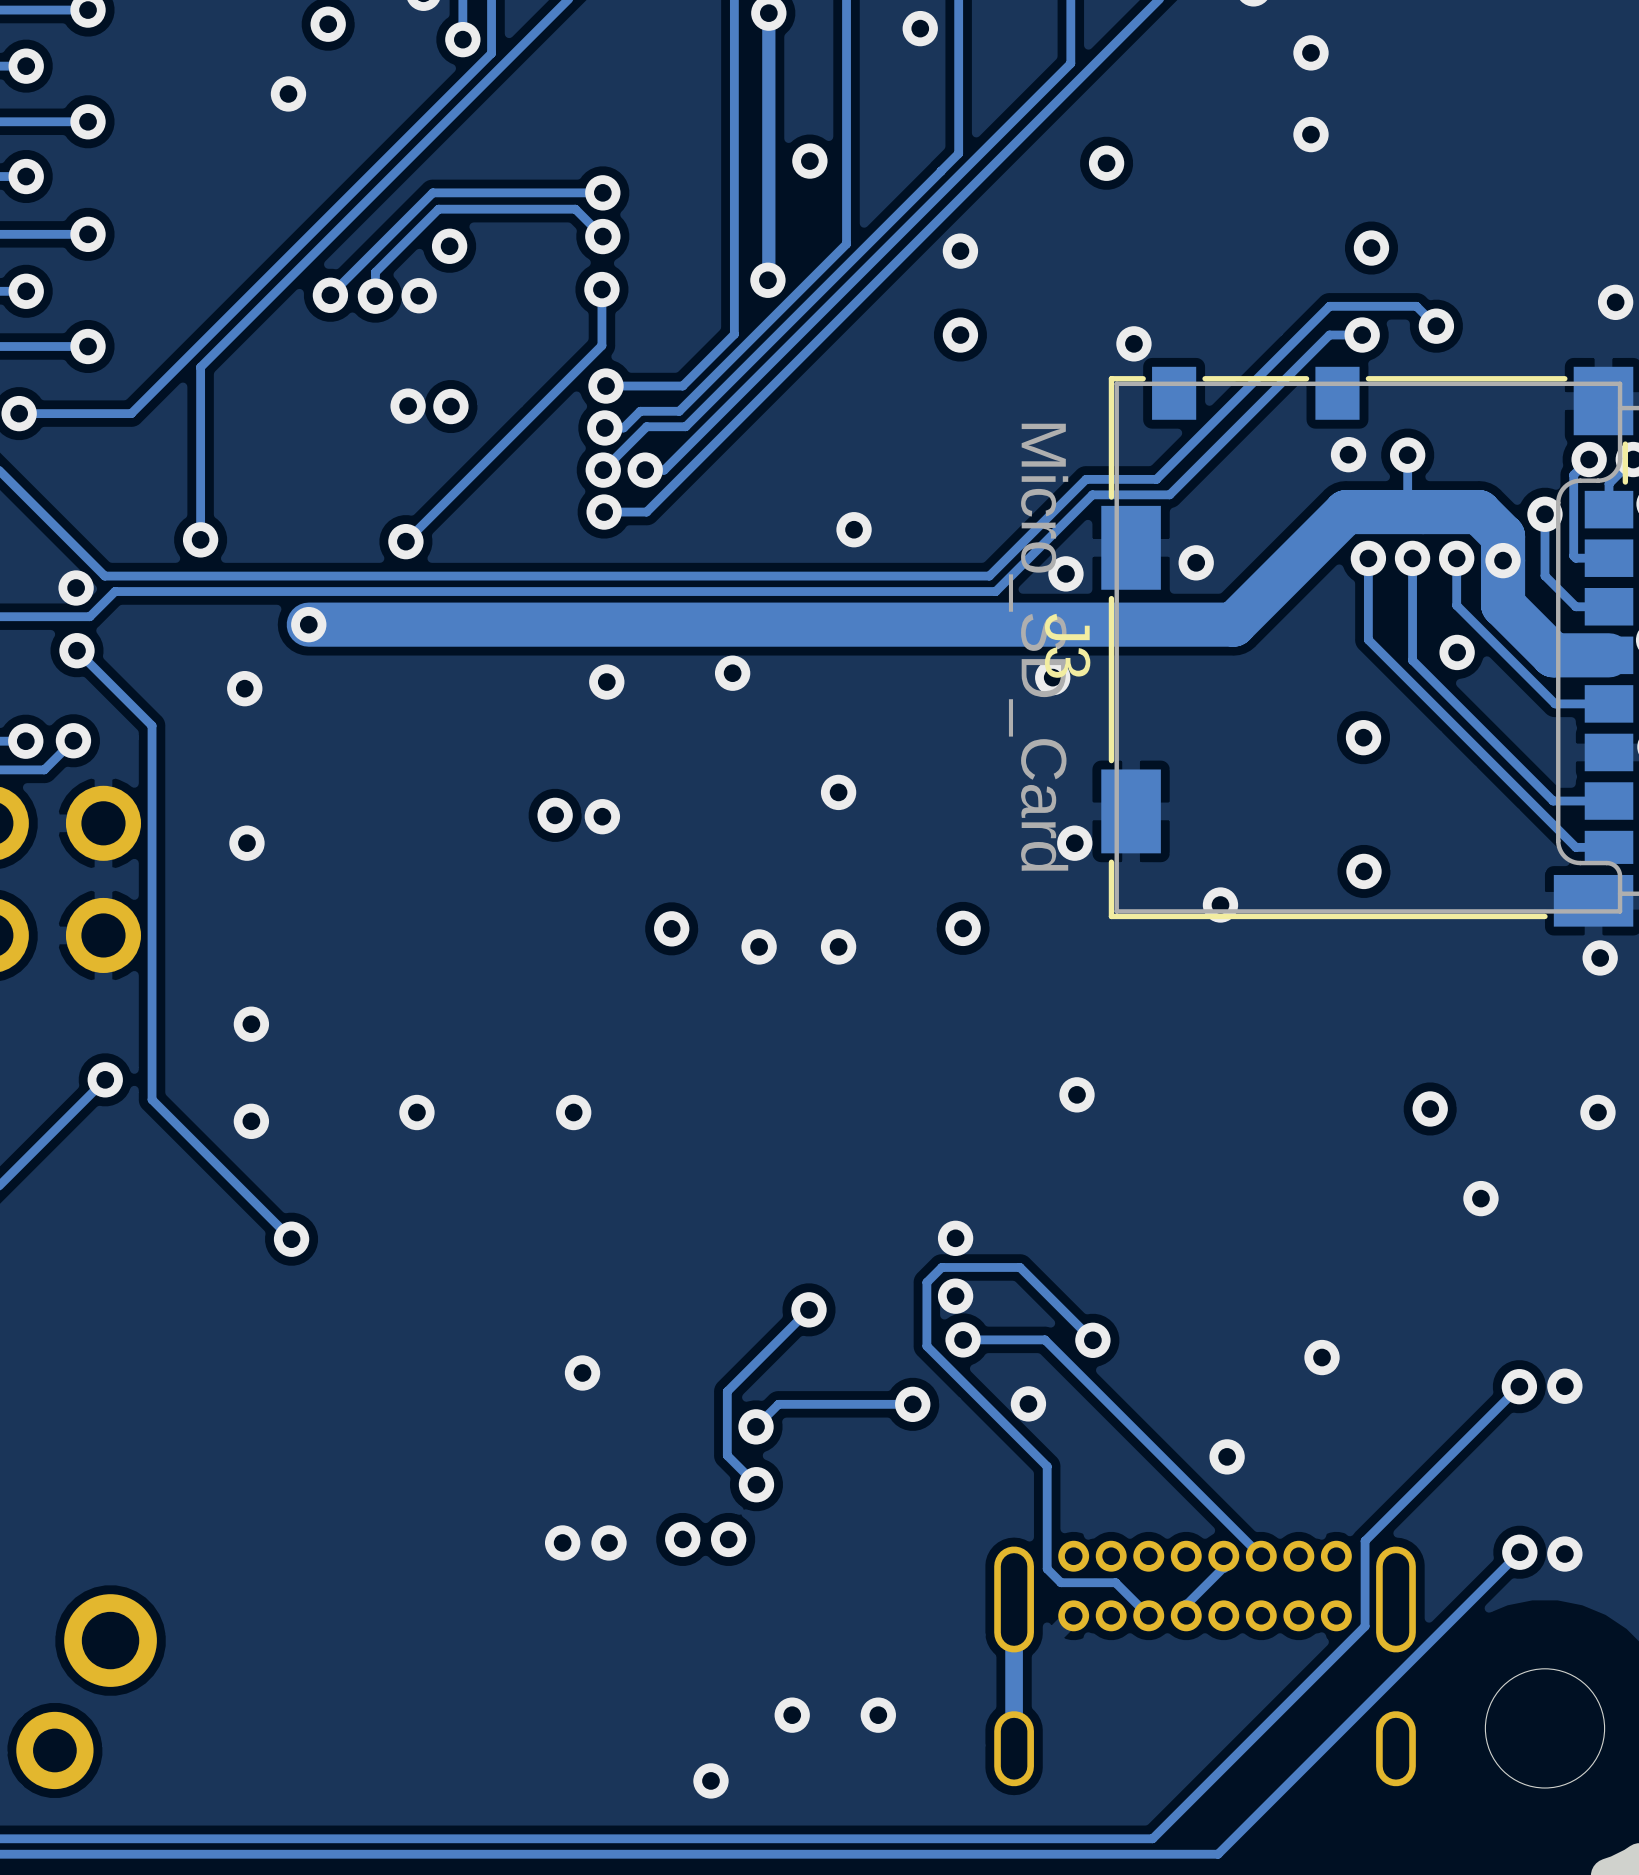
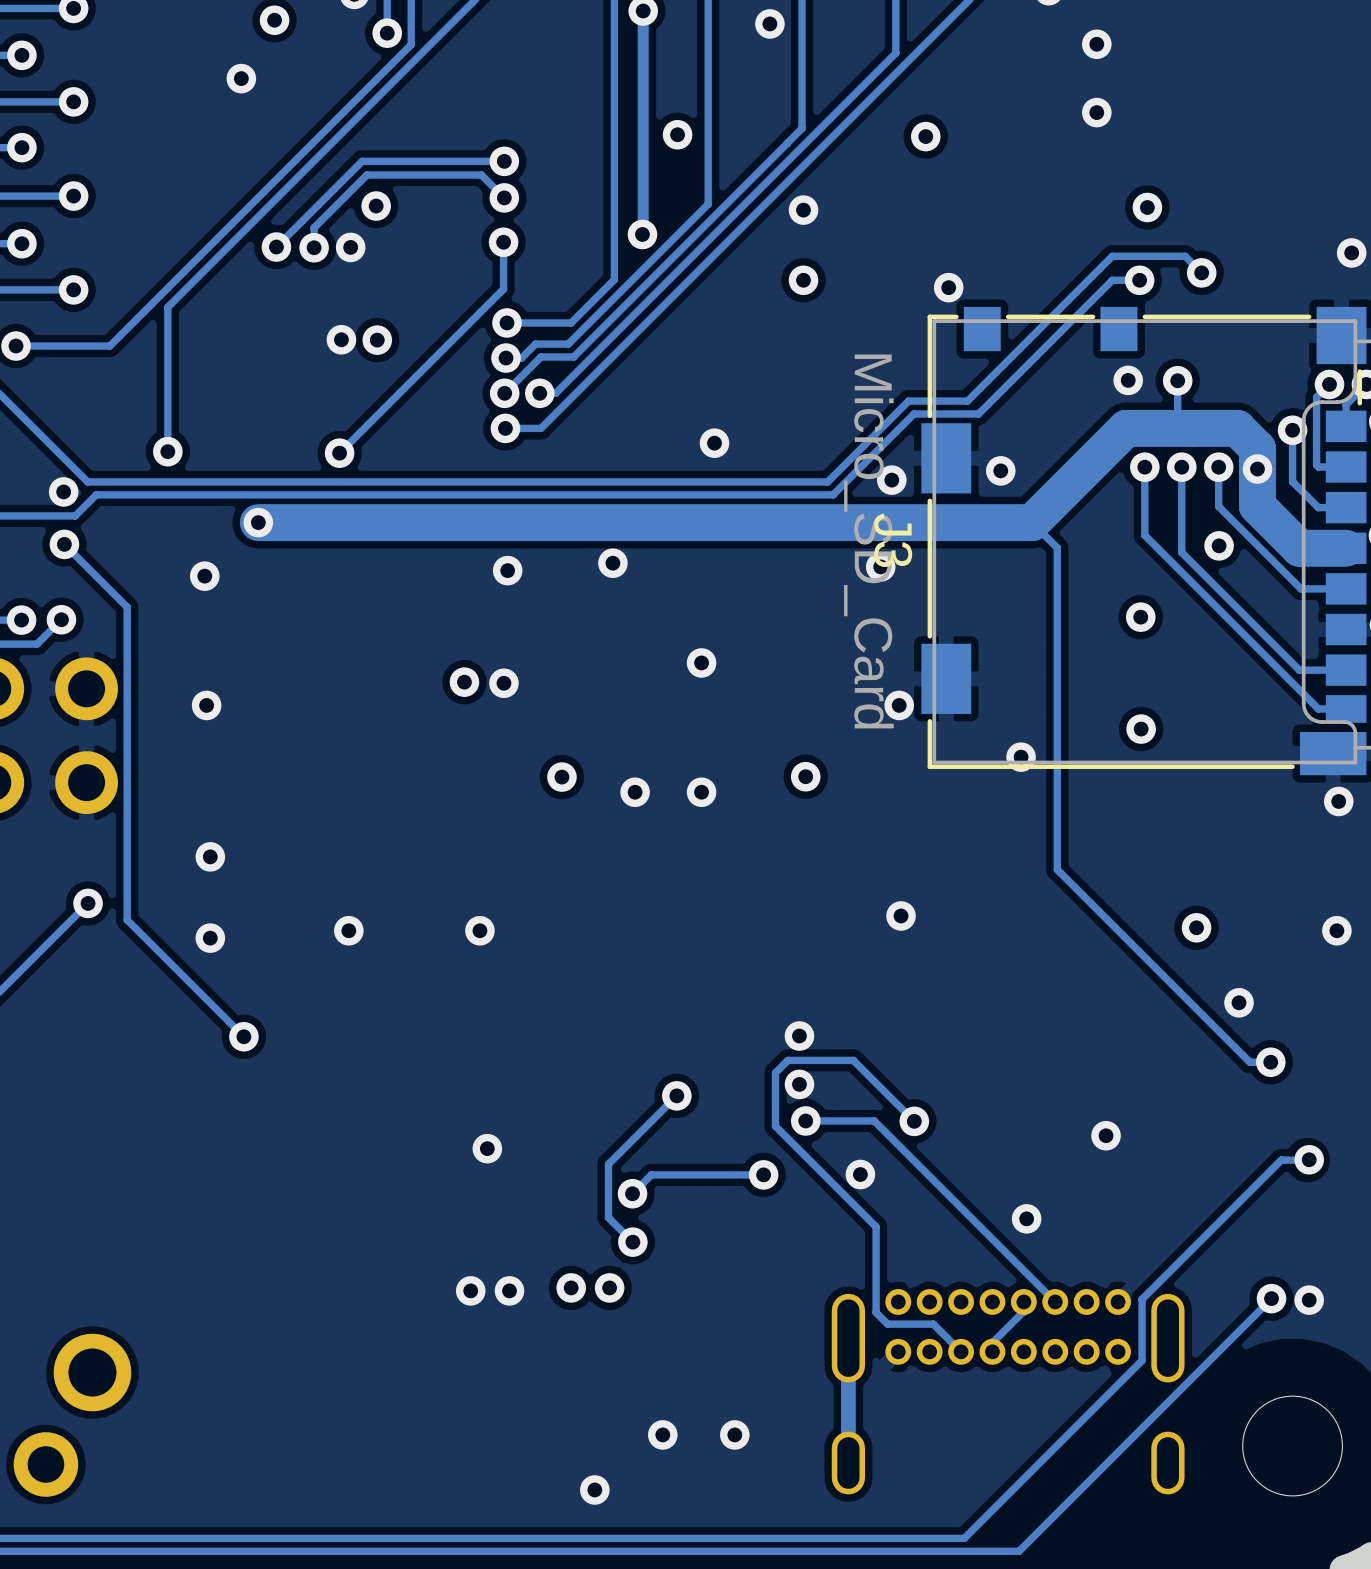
track: none -> (1032, 522) (1057, 547) (1057, 869) (1249, 1062) (1270, 1062)
track: (1519, 1386) (1365, 1540) (1365, 1553) -> (1307, 1160) (1281, 1160) (1142, 1299)
via position: (1519, 1386) -> (1270, 1062)

